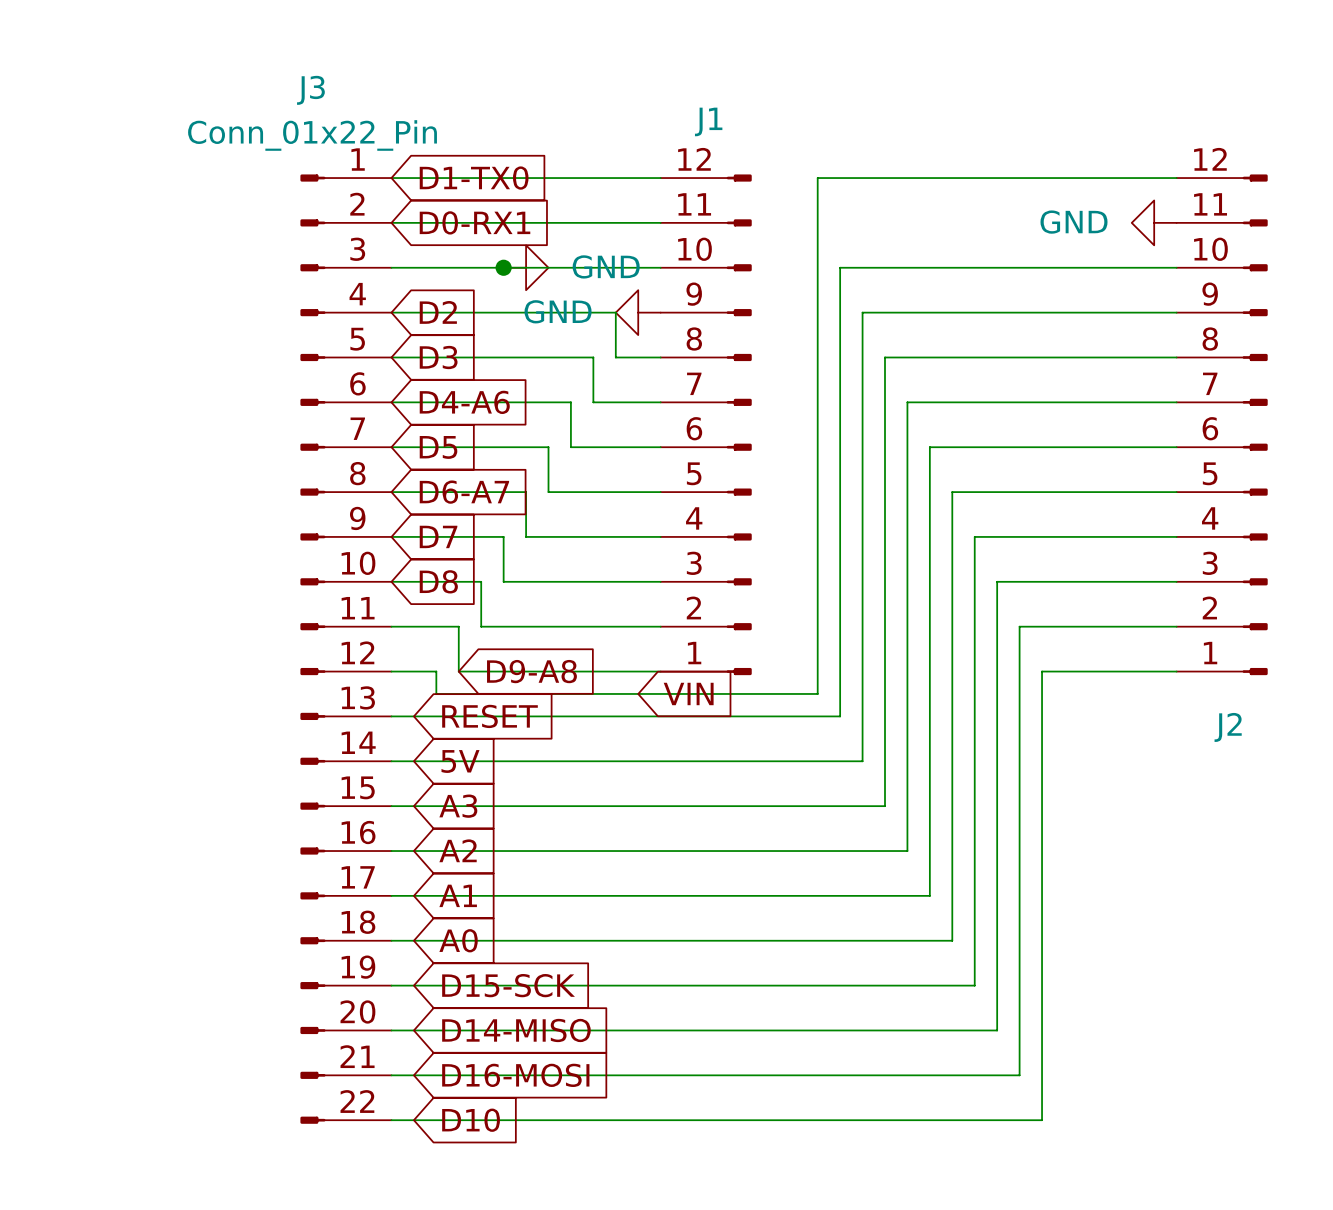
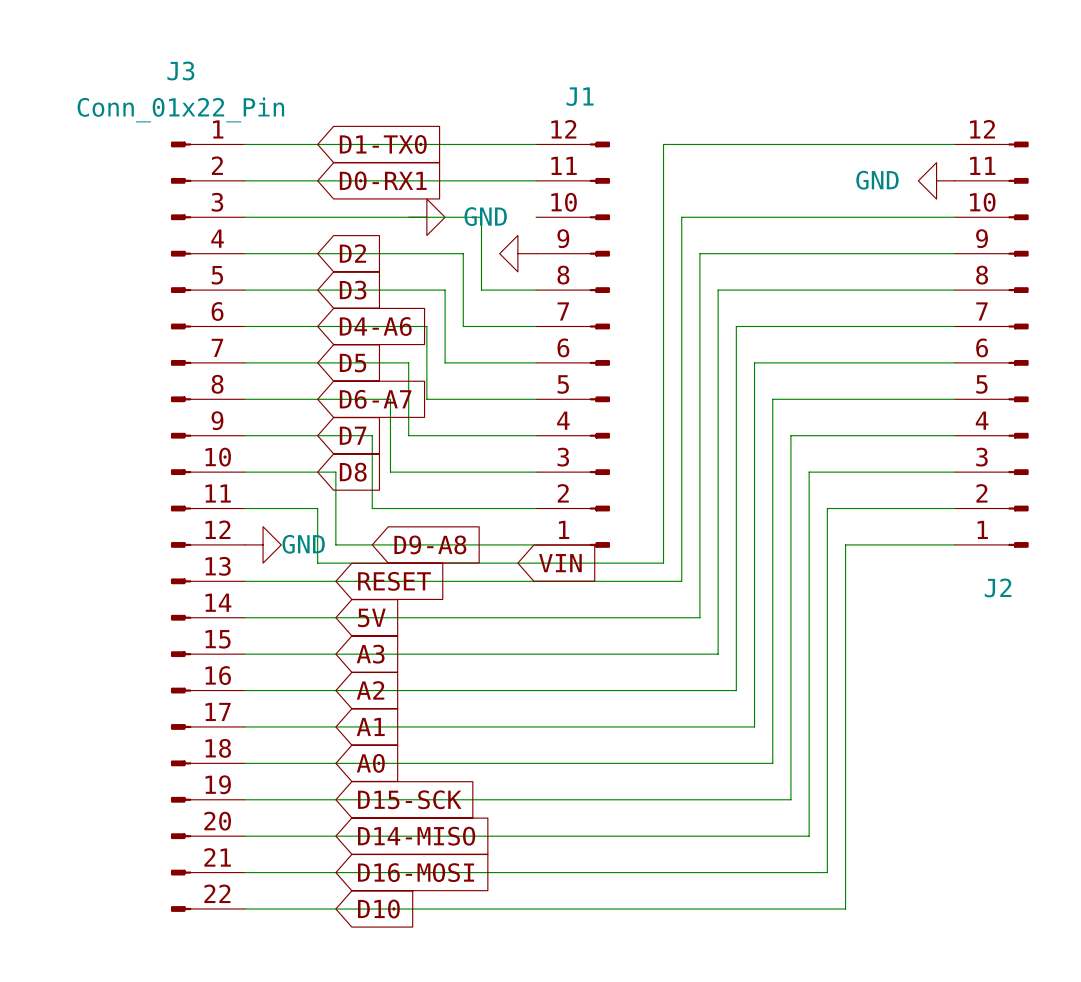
junction: (503, 267) -> none
wire: (593, 267) (660, 267) -> none
power symbol text: GND (558, 311) -> none
wire: (570, 312) (615, 312) (615, 357) -> (481, 217) (481, 290) (499, 290)
wire: none -> (463, 253) (463, 326) (481, 326)
wire: (548, 357) (593, 357) (593, 402) -> (445, 290) (445, 362) (463, 362)
wire: (526, 402) (570, 402) (570, 447) -> (426, 326) (426, 399) (445, 399)
wire: (503, 447) (548, 447) (548, 492) -> none
wire: (481, 492) (526, 492) (526, 536) -> (408, 362) (408, 435) (426, 435)
wire: (458, 536) (503, 536) (503, 581) -> (390, 399) (390, 472) (408, 472)
wire: (413, 581) (481, 581) (481, 626) -> (372, 435) (372, 508) (390, 508)
wire: none -> (244, 508) (317, 508) (317, 563) (354, 563)
wire: (391, 626) (458, 626) (458, 671) -> none
J3 position: (345, 649) -> (207, 526)
power symbol: none -> GND (263, 544)
wire: (391, 671) (413, 671) -> (335, 472) (335, 544)
wire: (436, 671) (436, 693) -> (354, 544) (372, 544)

